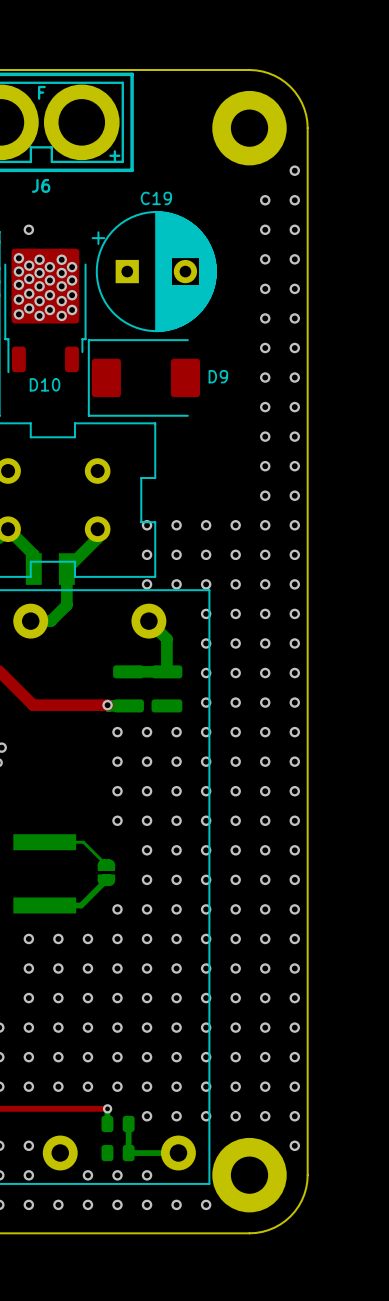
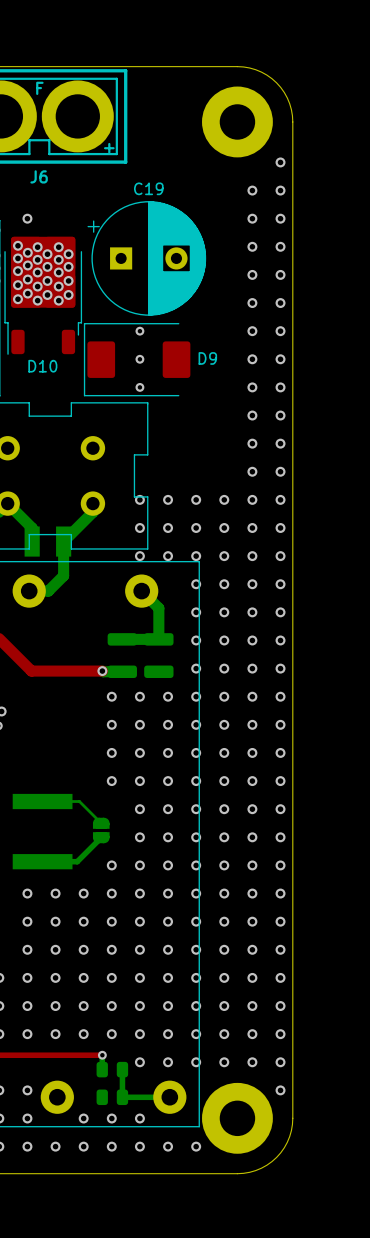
via: none -> (139, 331)
via: none -> (139, 359)
via: none -> (139, 387)

